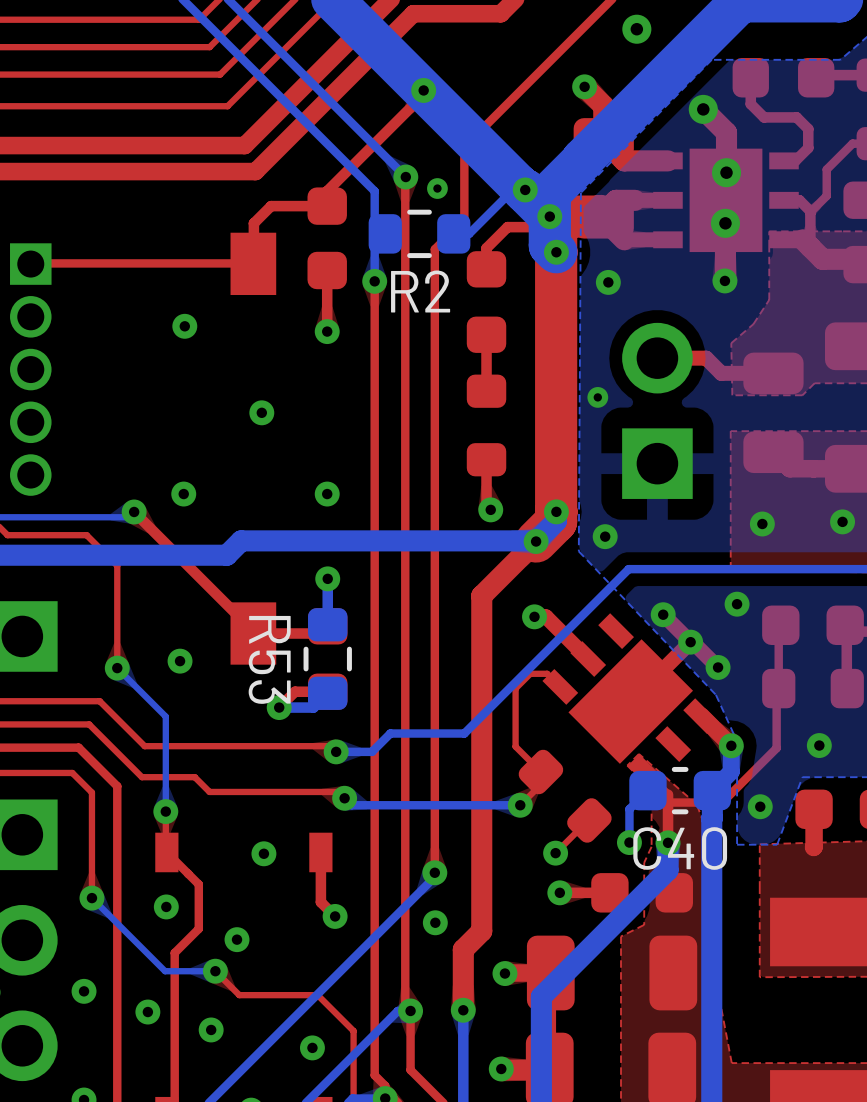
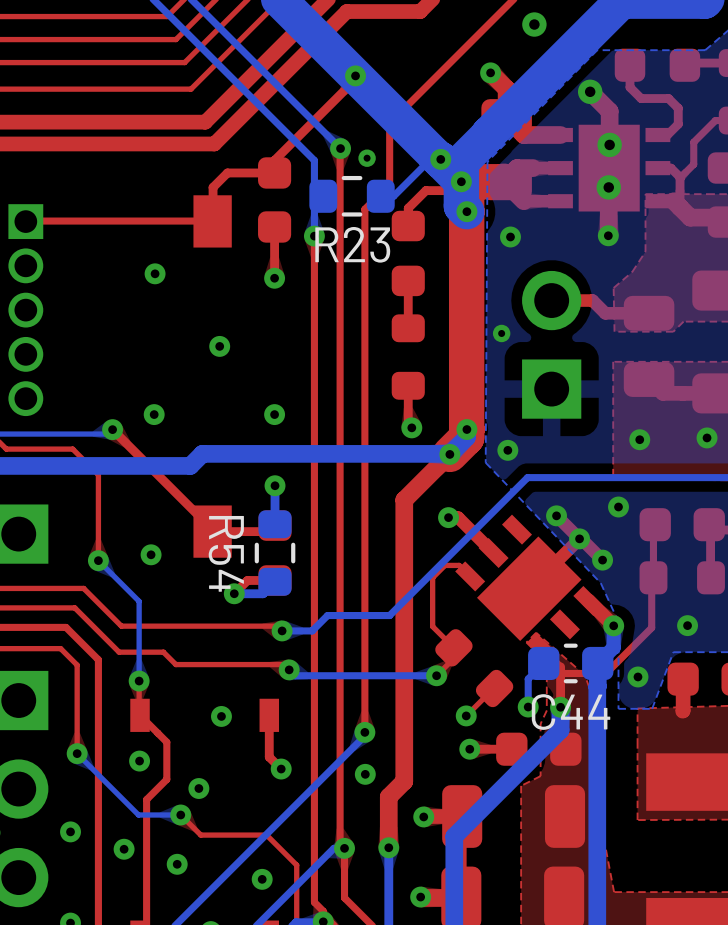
R2 name: R2 (420, 291) -> R23 (352, 244)
R53 name: R53 (269, 659) -> R54 (226, 553)
C40 name: C40 (680, 848) -> C44 (571, 712)

